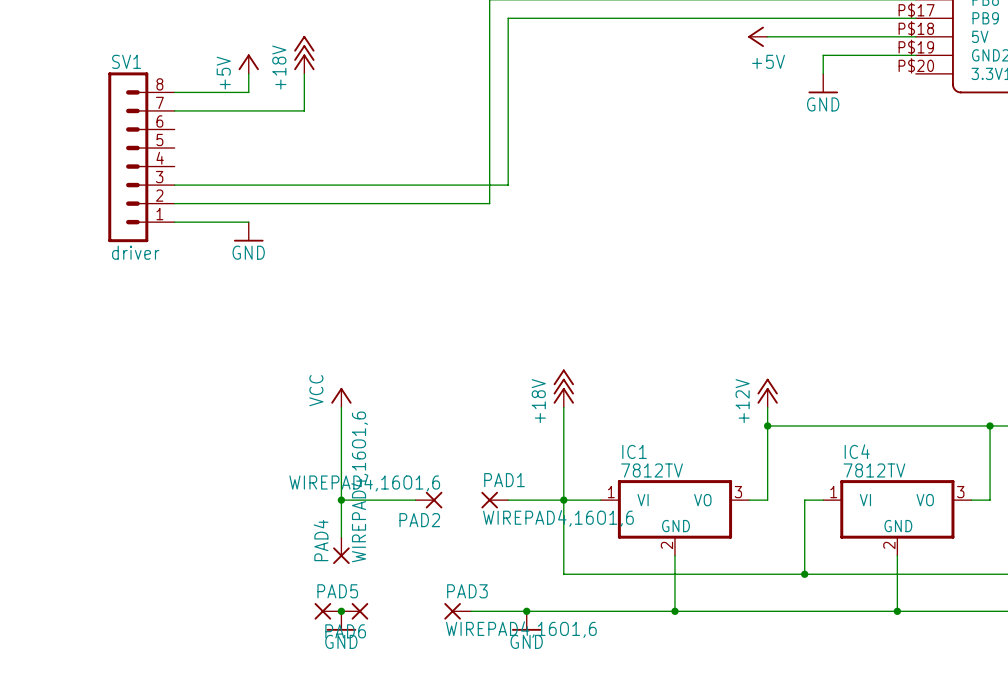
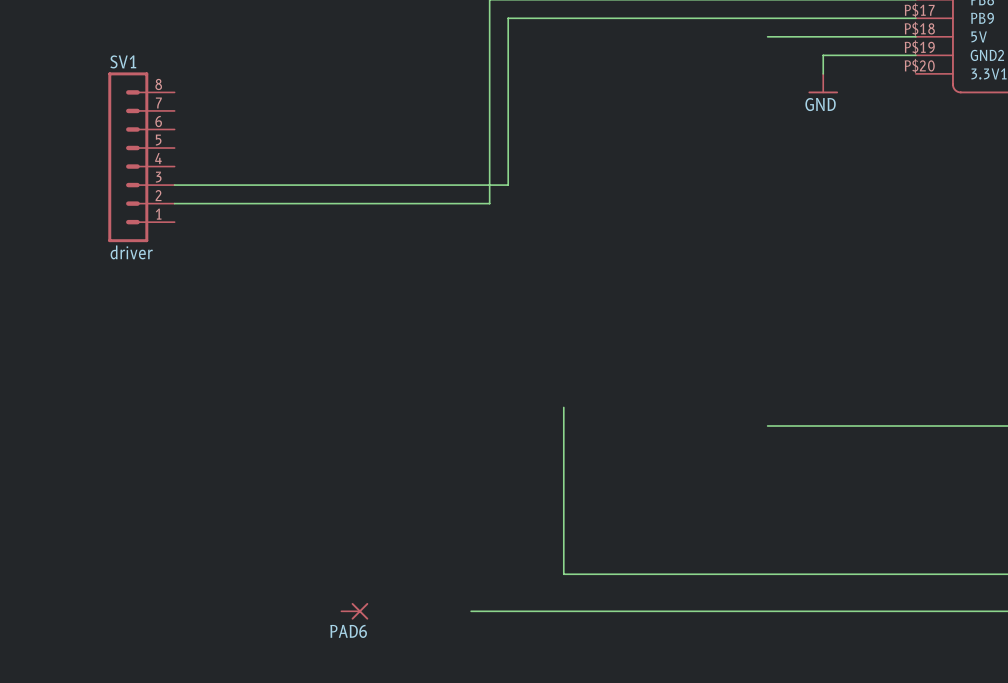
power symbol: +5V (757, 36) -> none
power symbol: +18V (304, 54) -> none
power symbol: +5V (248, 64) -> none
wire: (248, 73) (248, 92) (174, 92) -> none
wire: (304, 73) (304, 110) (174, 110) -> none
wire: (174, 222) (248, 222) -> none
power symbol: GND (248, 231) -> none
power symbol: +18V (563, 388) -> none
power symbol: +12V (767, 393) -> none
power symbol: VCC (341, 397) -> none
wire: (341, 407) (341, 537) -> none
wire: (767, 407) (767, 500) (749, 500) -> none
junction: (767, 425) -> none
wire: (990, 425) (990, 500) (971, 500) -> none
junction: (990, 425) -> none
wire: (341, 500) (415, 500) -> none
junction: (341, 500) -> none
PAD2: WIREPAD4,16O1,6 (428, 500) -> none
PAD1: WIREPAD4,16O1,6 (494, 500) -> none
wire: (508, 500) (600, 500) -> none
junction: (563, 500) -> none
wire: (823, 500) (804, 500) (804, 574) -> none
IC1: 7812TV (674, 517) -> none
IC4: 7812TV (897, 517) -> none
PAD4: WIREPAD4,16O1,6 (341, 550) -> none
wire: (674, 555) (674, 611) -> none
wire: (897, 555) (897, 611) -> none
junction: (804, 574) -> none
PAD5: (327, 611) -> none
junction: (341, 611) -> none
PAD3: WIREPAD4,16O1,6 (457, 611) -> none
junction: (526, 611) -> none
junction: (674, 611) -> none
junction: (897, 611) -> none
power symbol: GND (341, 621) -> none
power symbol: GND (526, 621) -> none

